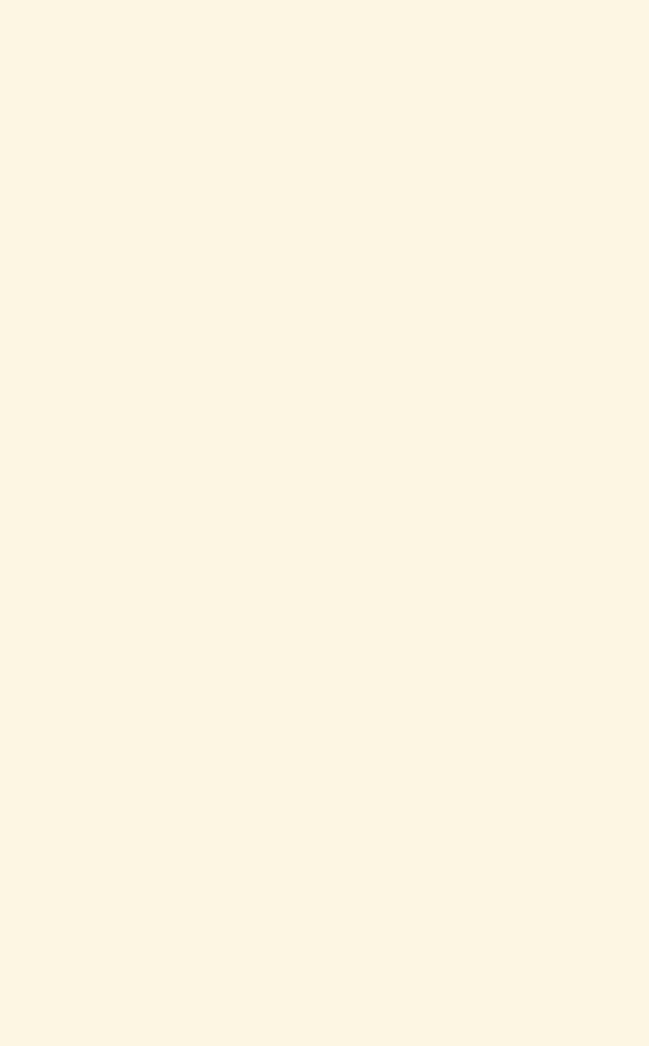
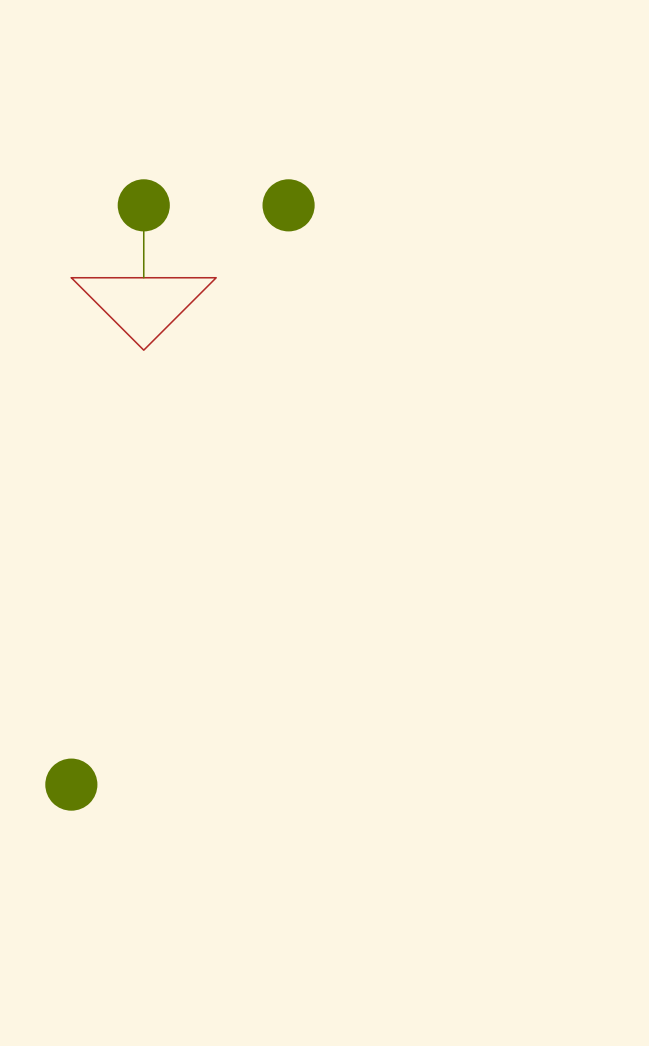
wire: none -> (143, 205) (143, 277)
junction: none -> (143, 205)
junction: none -> (288, 205)
power symbol: none -> (143, 313)
junction: none -> (71, 784)

